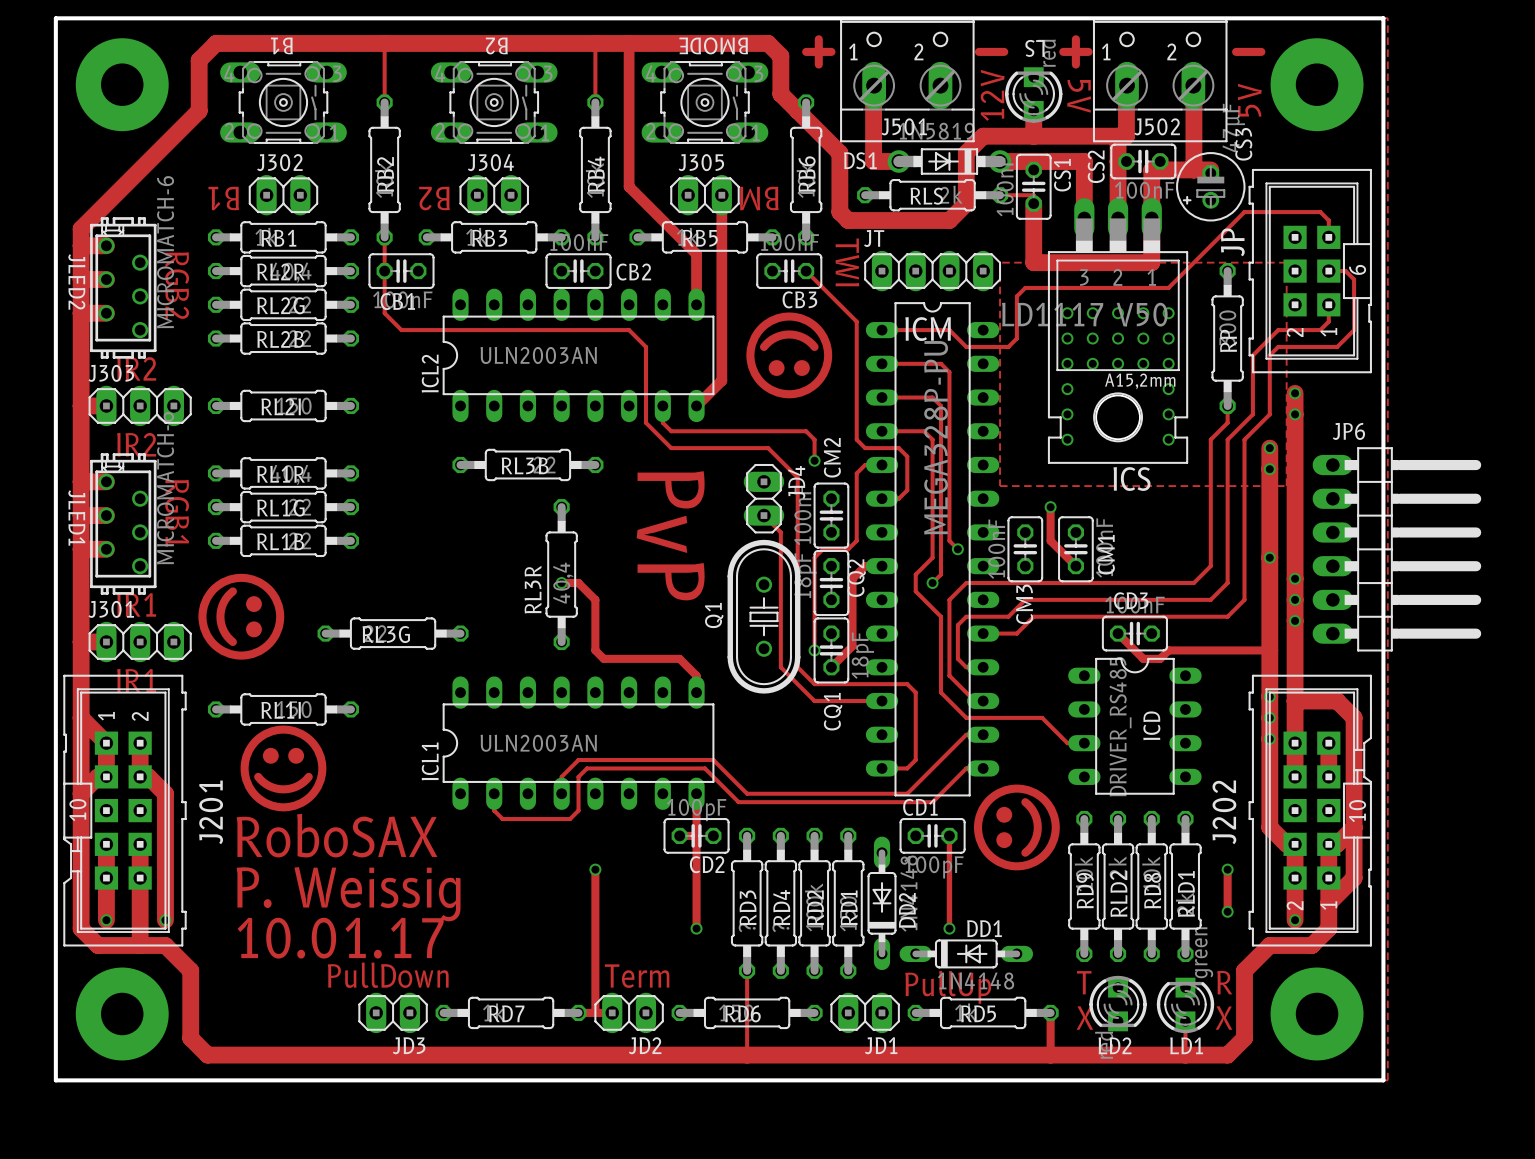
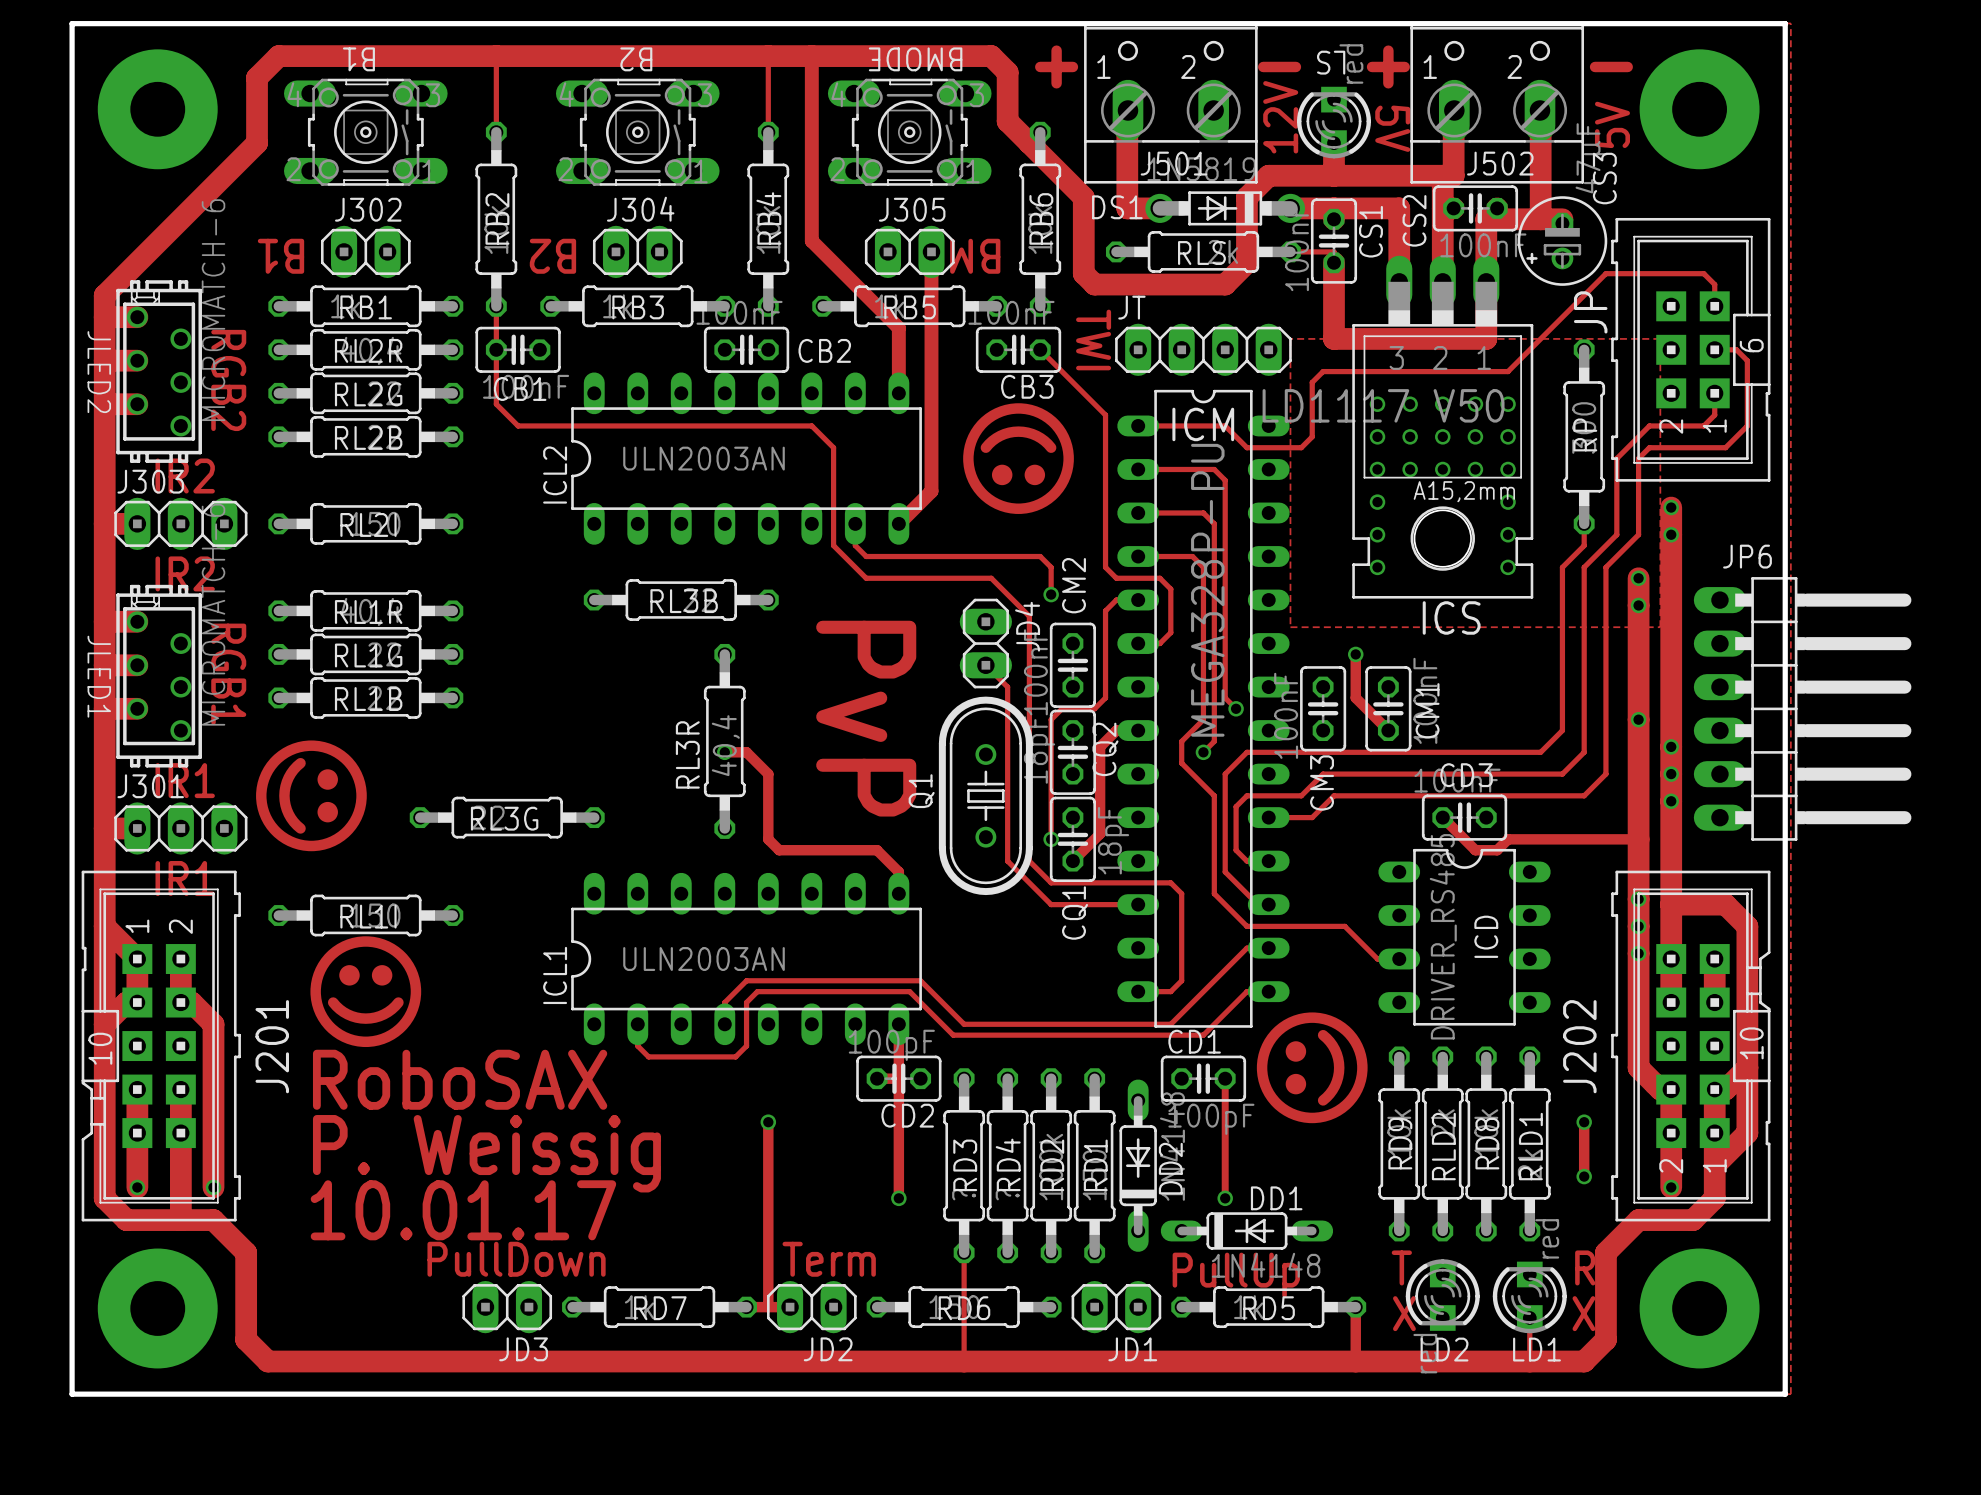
LD1 value: green (1204, 952) -> red (1547, 1238)

